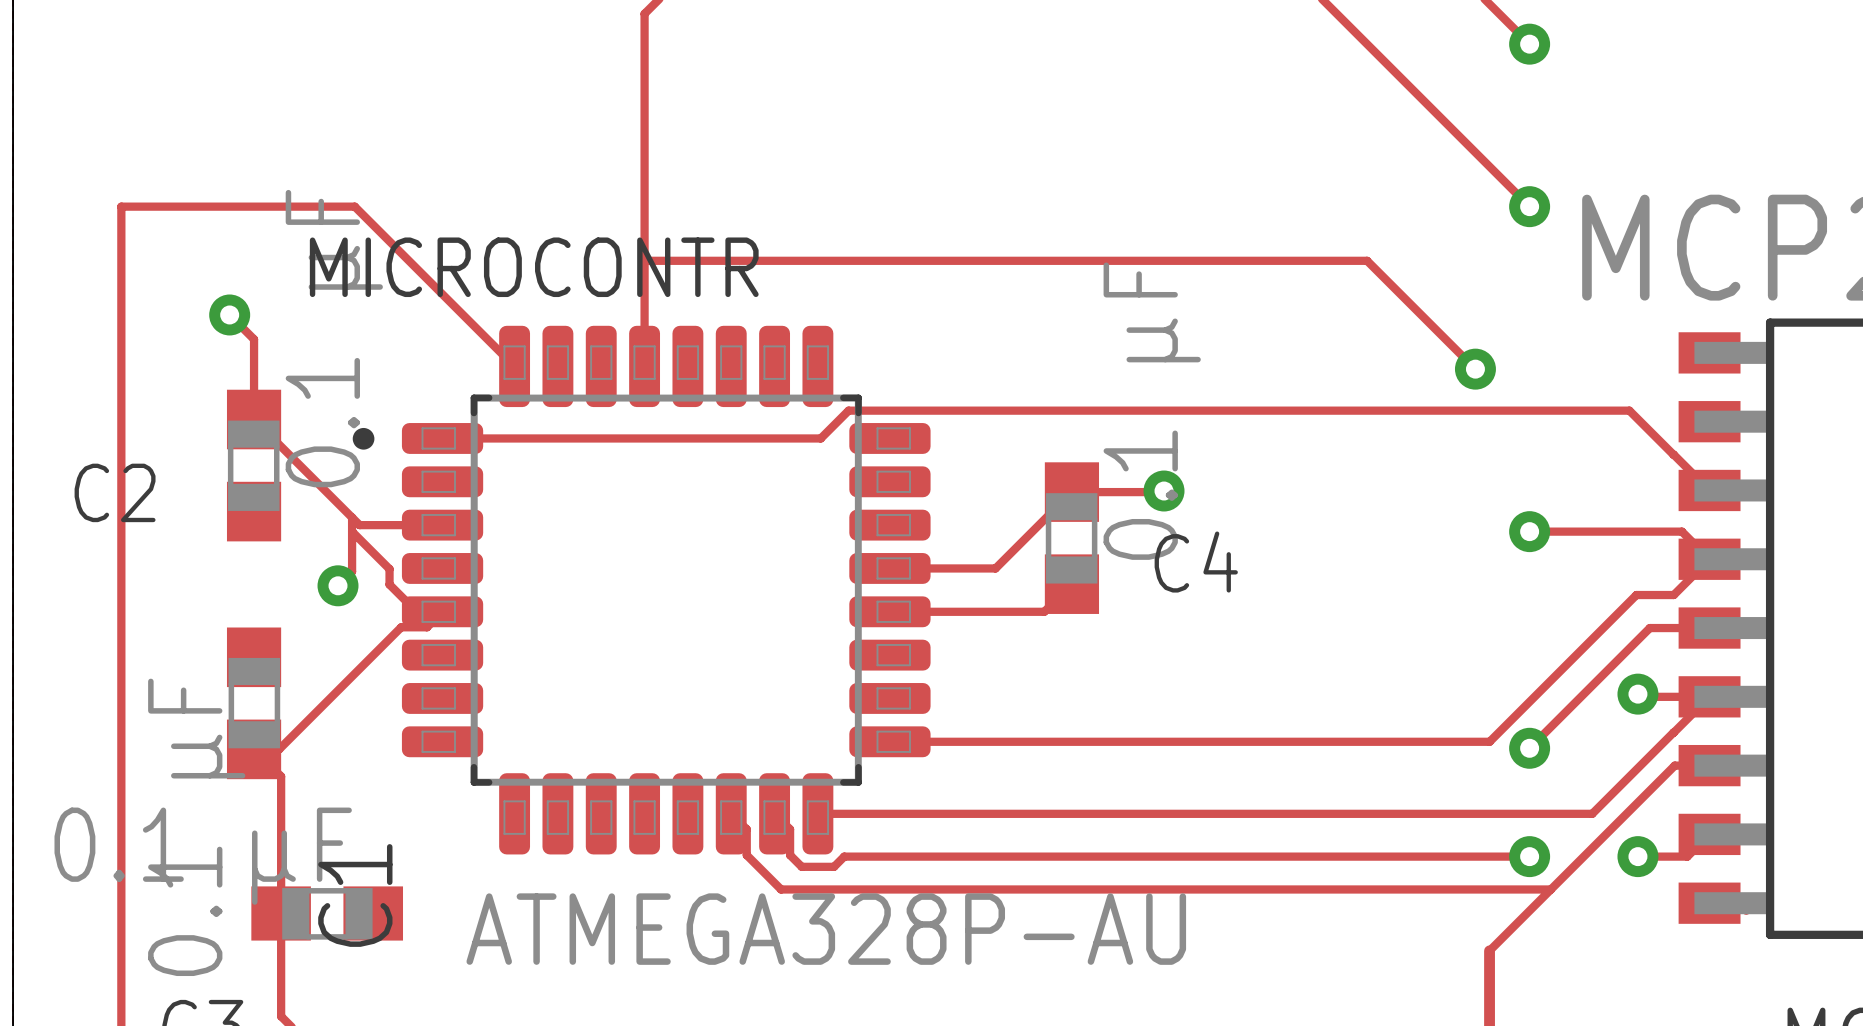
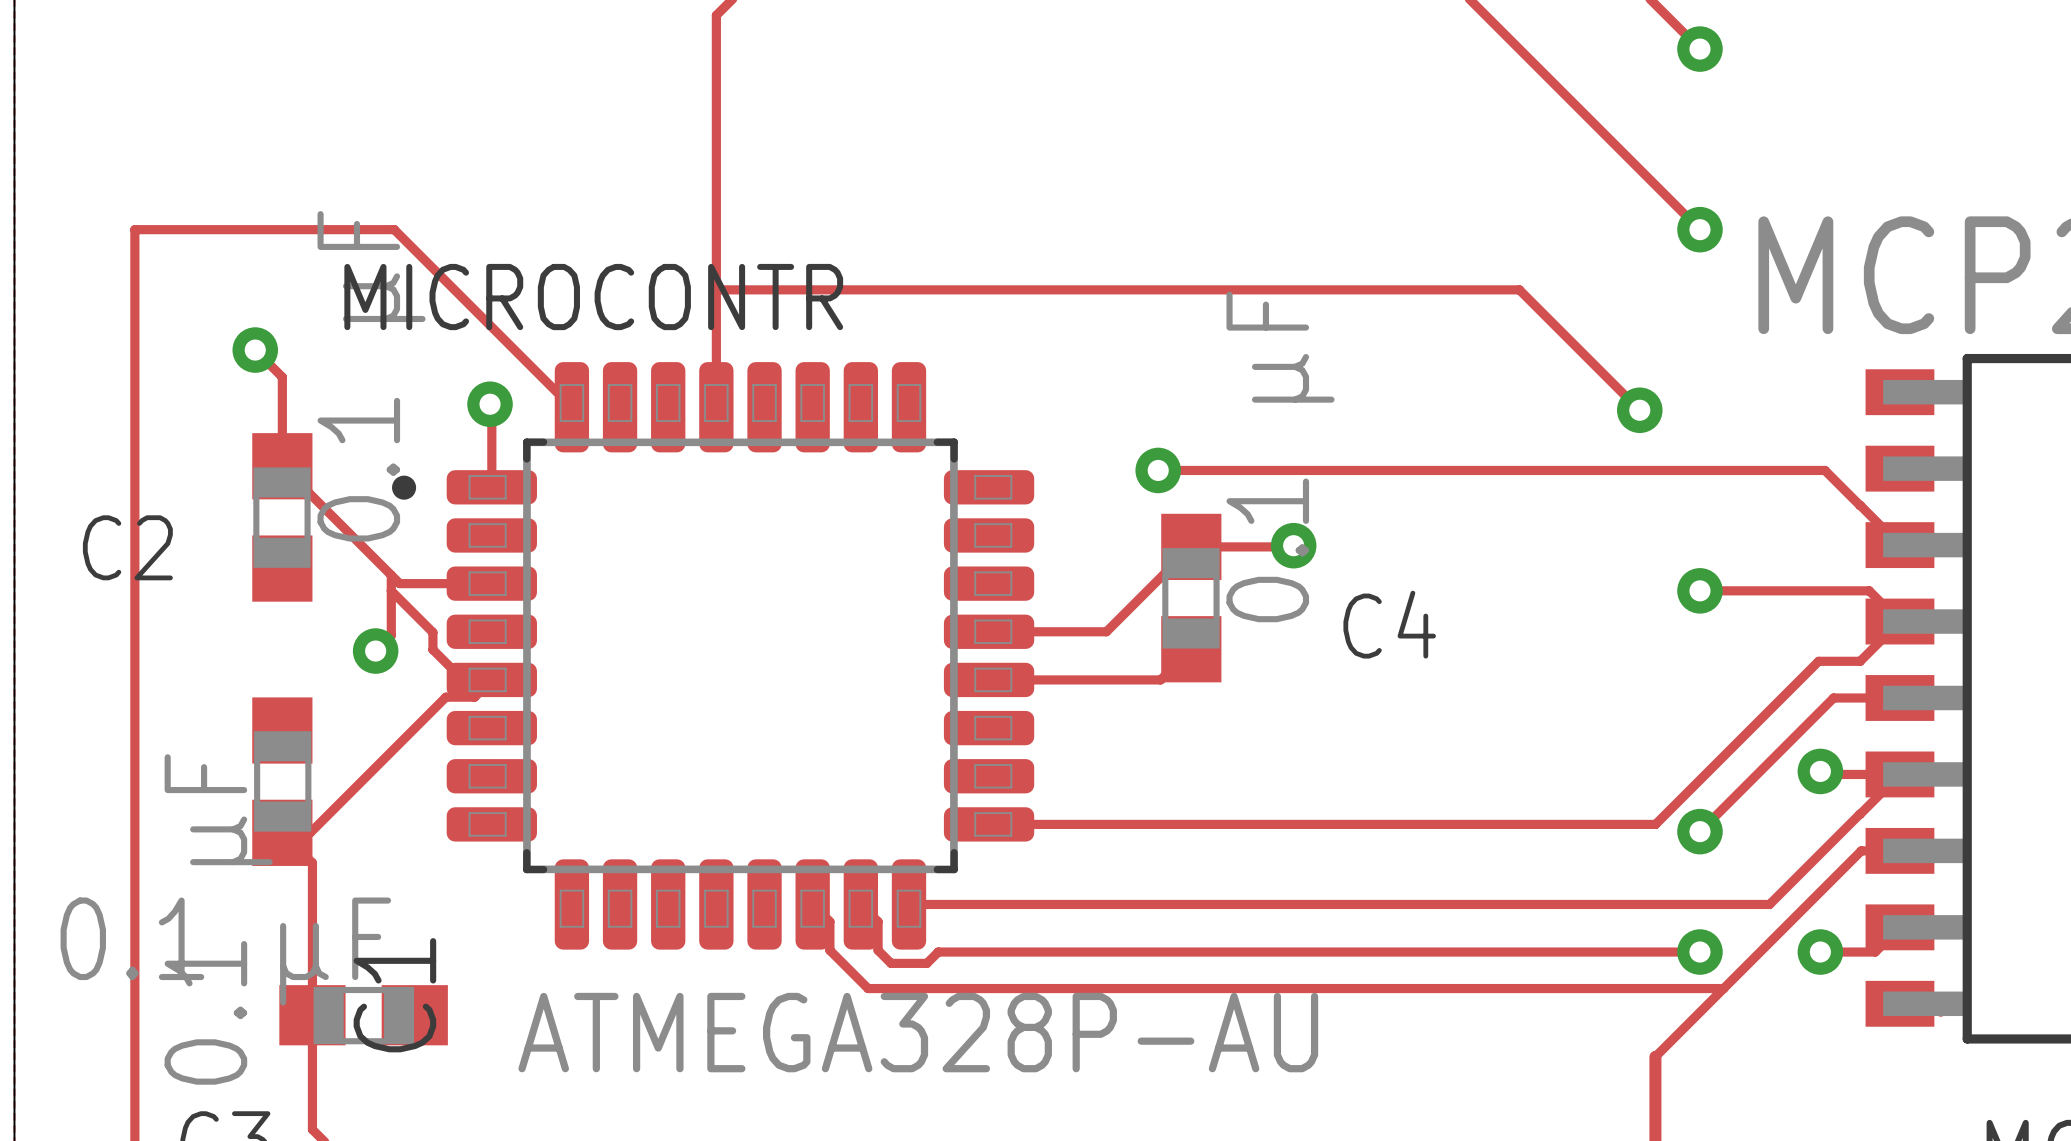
track: none -> (490, 404) (491, 406) (491, 487)
via: none -> (490, 404)
via: none -> (1158, 470)
track: (1642, 423) (1629, 410) (848, 410) (820, 438) (442, 438) -> (1824, 470) (1158, 470)
C4 name position: C4 (1196, 562) -> C4 (1389, 624)

